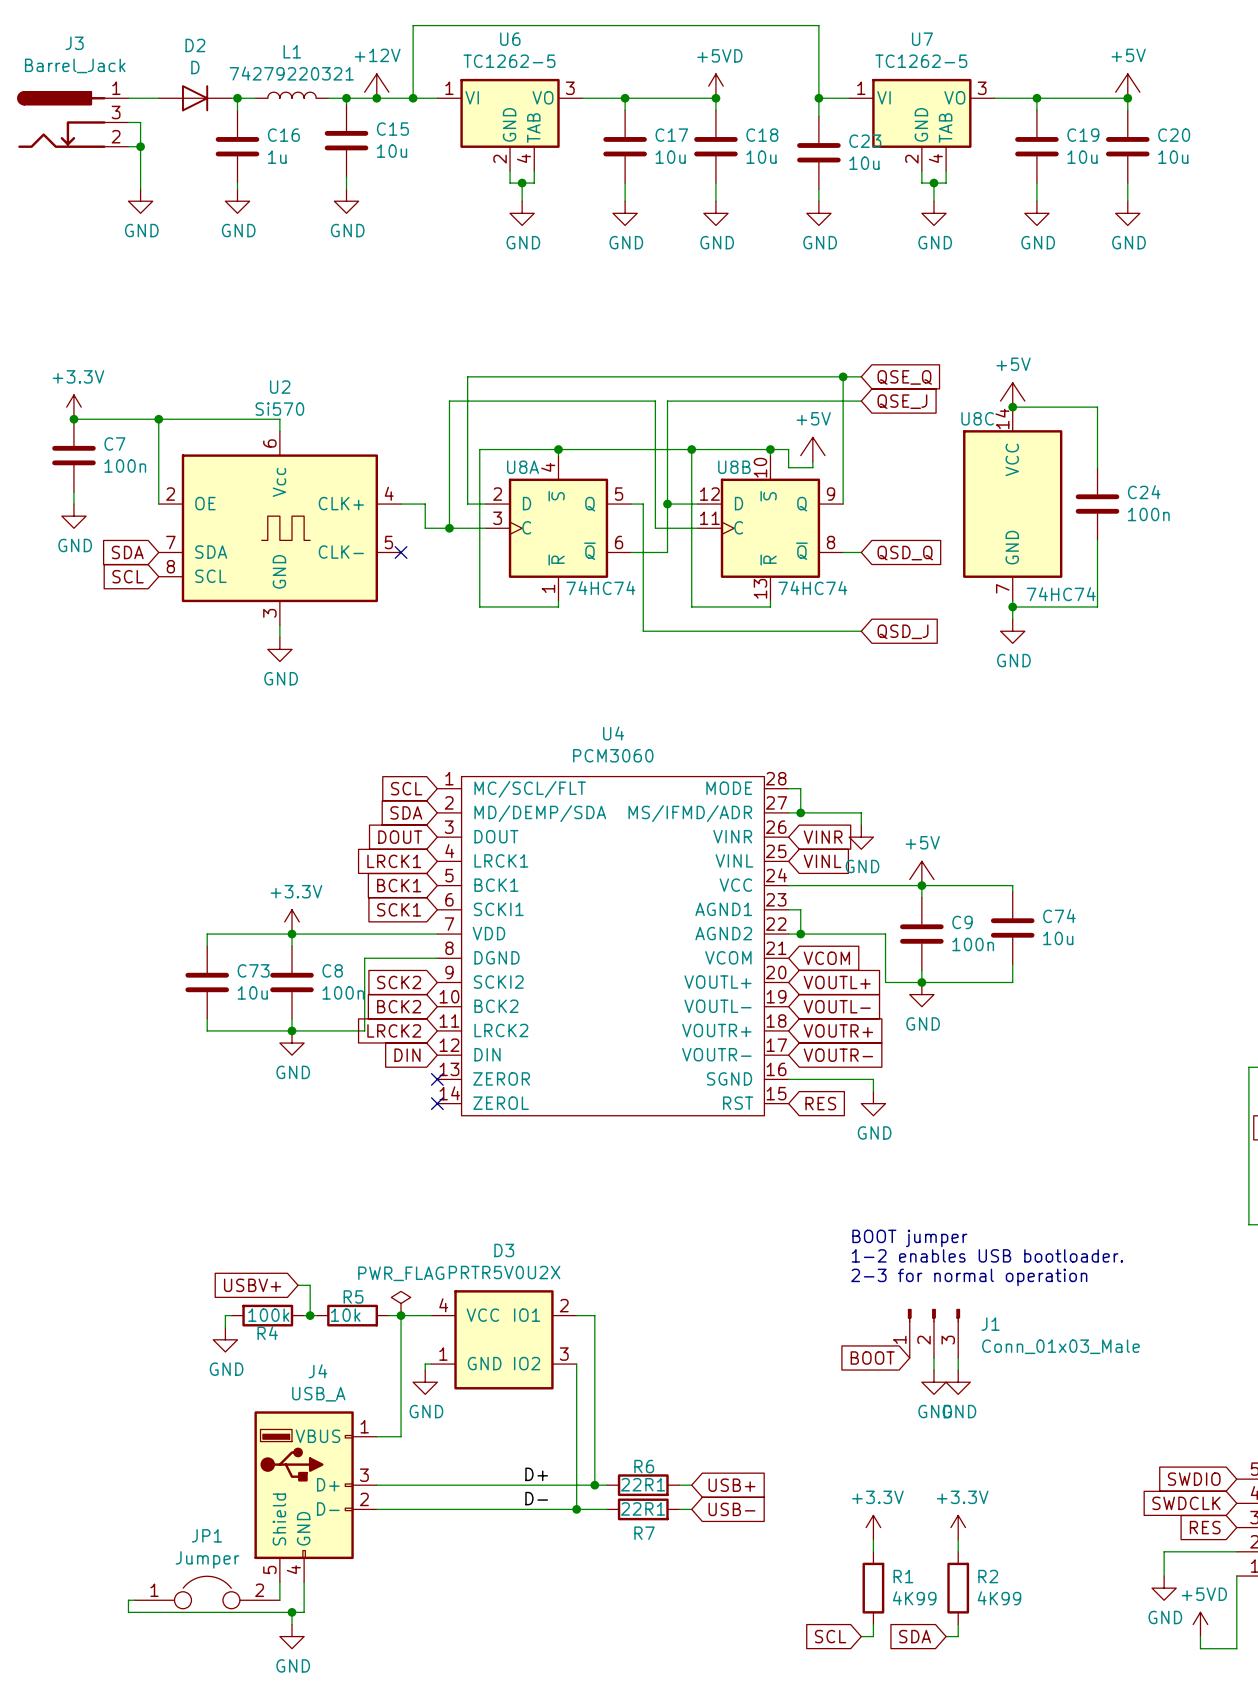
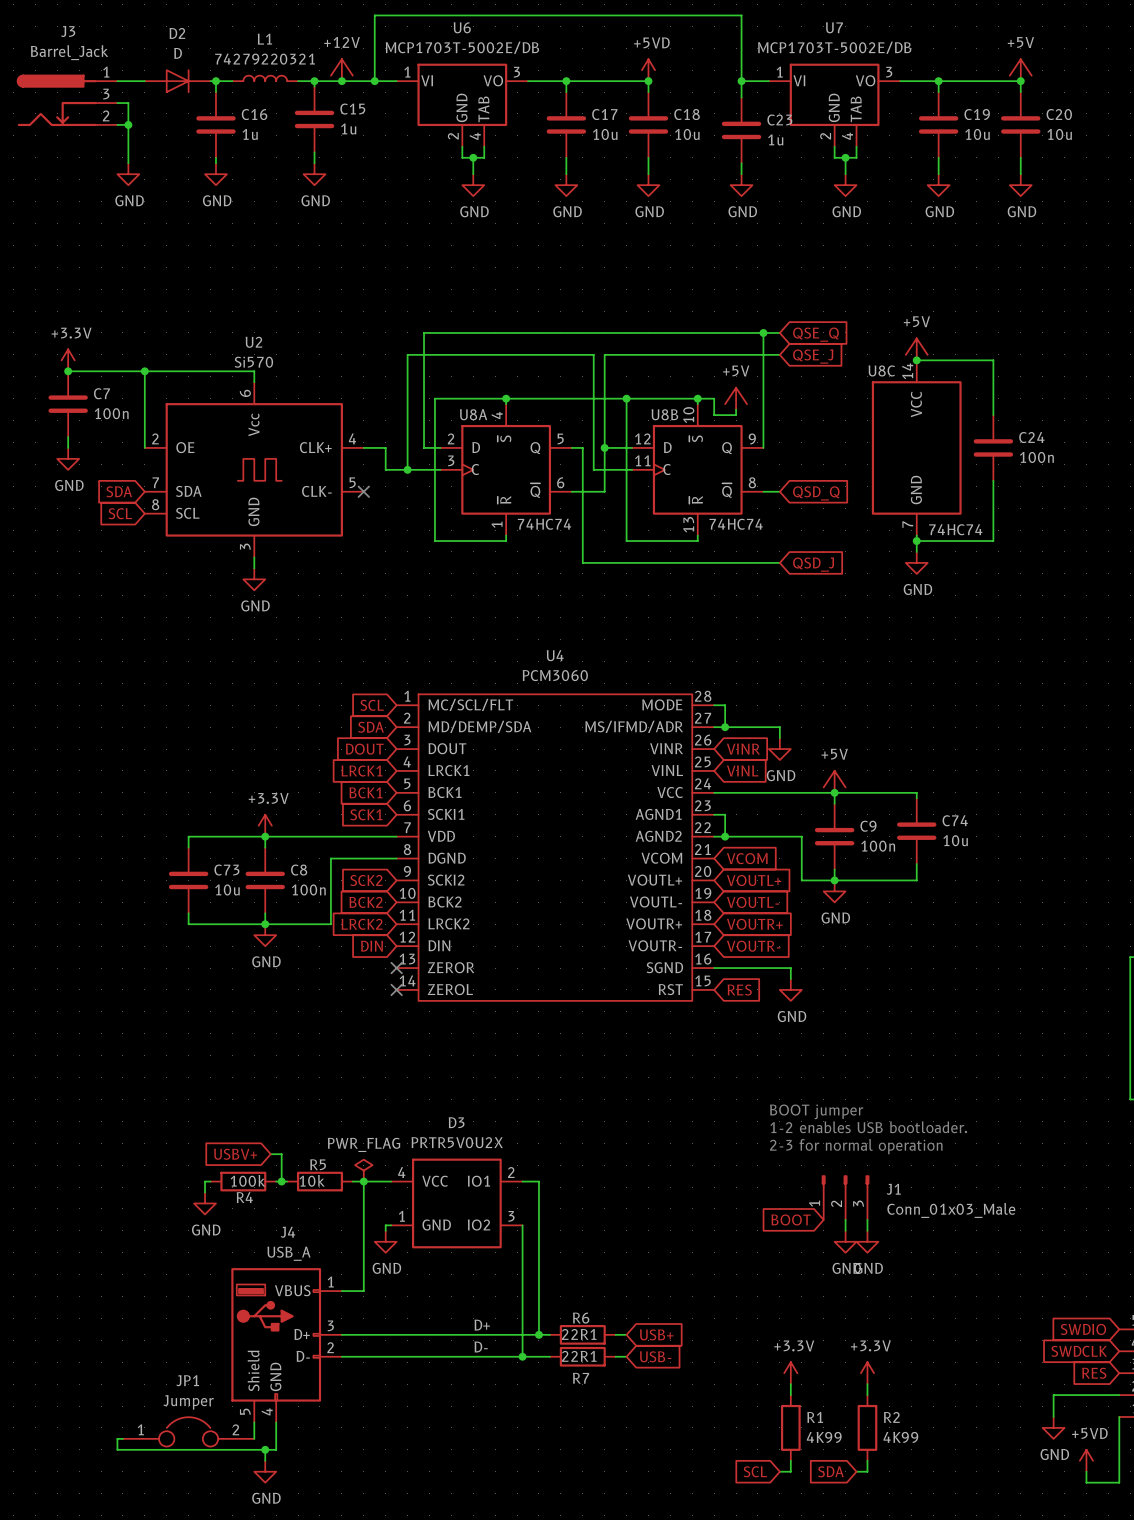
U6 value: TC1262-5 (509, 61) -> MCP1703T-5002E/DB (462, 47)
U7 value: TC1262-5 (921, 61) -> MCP1703T-5002E/DB (834, 47)
C15 value: 10u (392, 151) -> 1u (348, 128)
C23 value: 10u (864, 163) -> 1u (775, 139)

